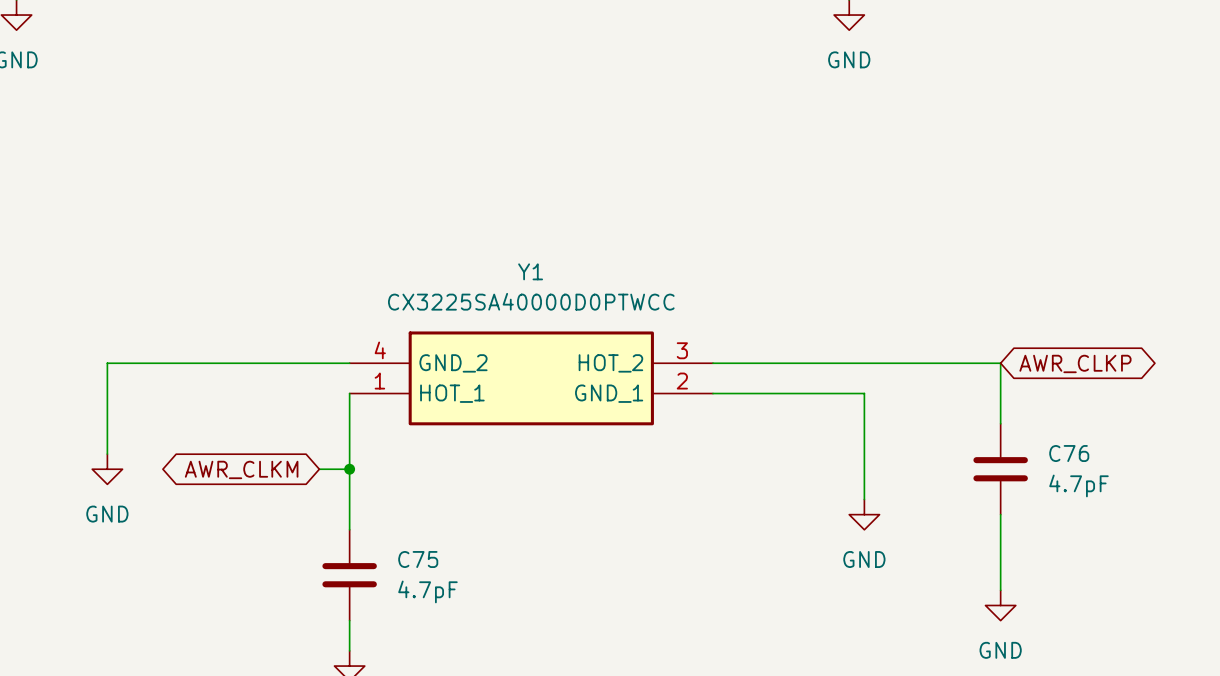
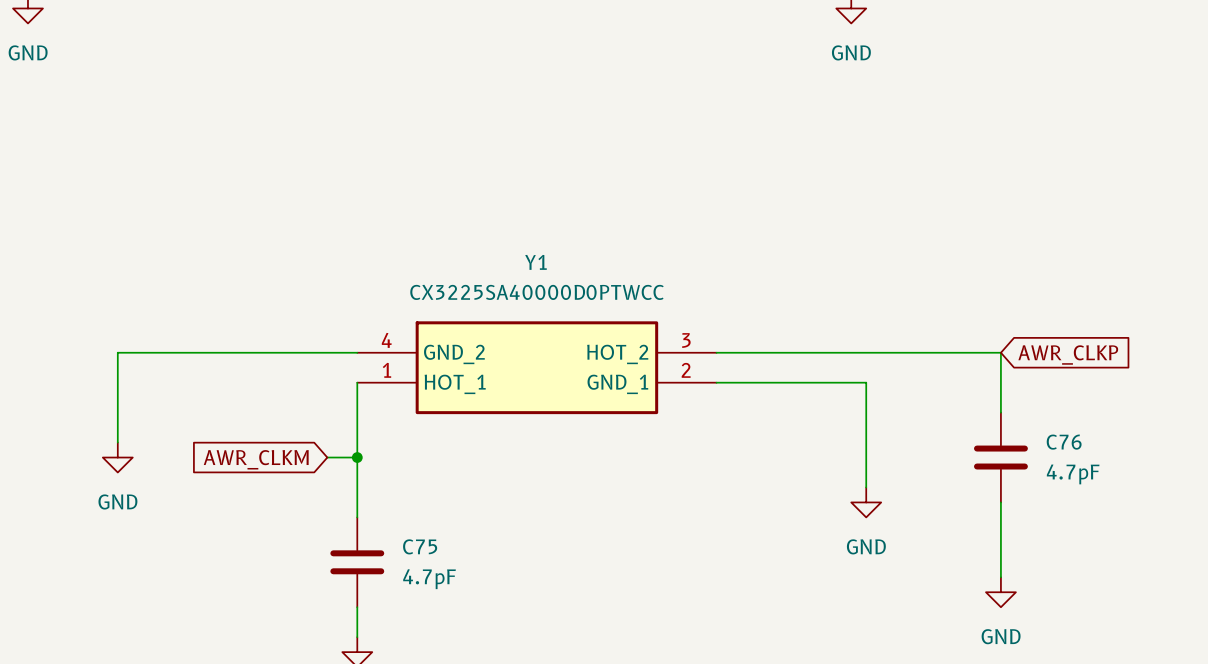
global label shape: bidirectional (1075, 363) -> input (1068, 354)
global label shape: bidirectional (241, 469) -> input (256, 459)

